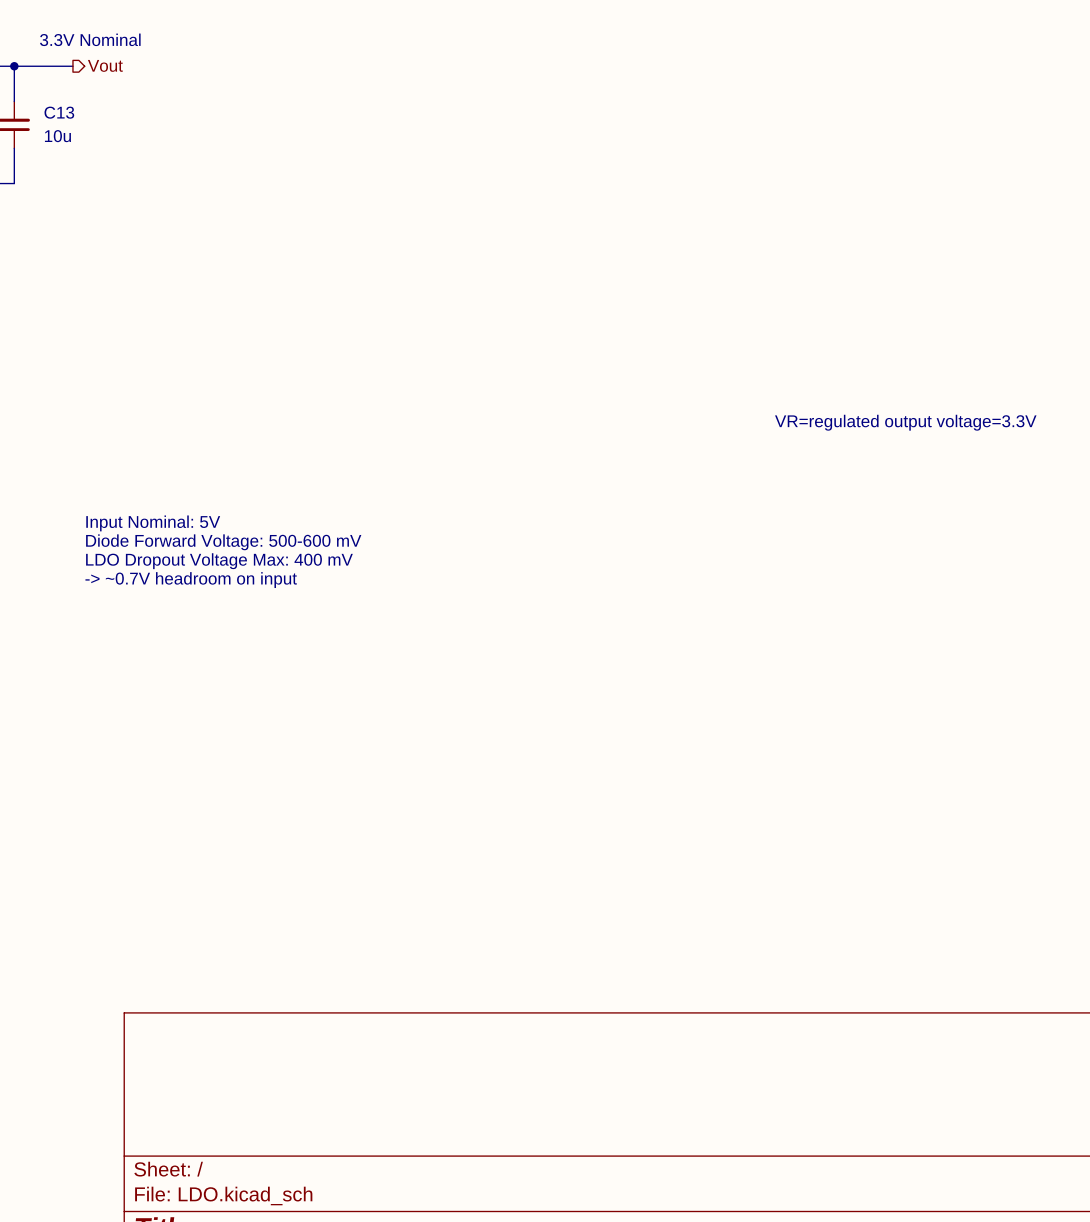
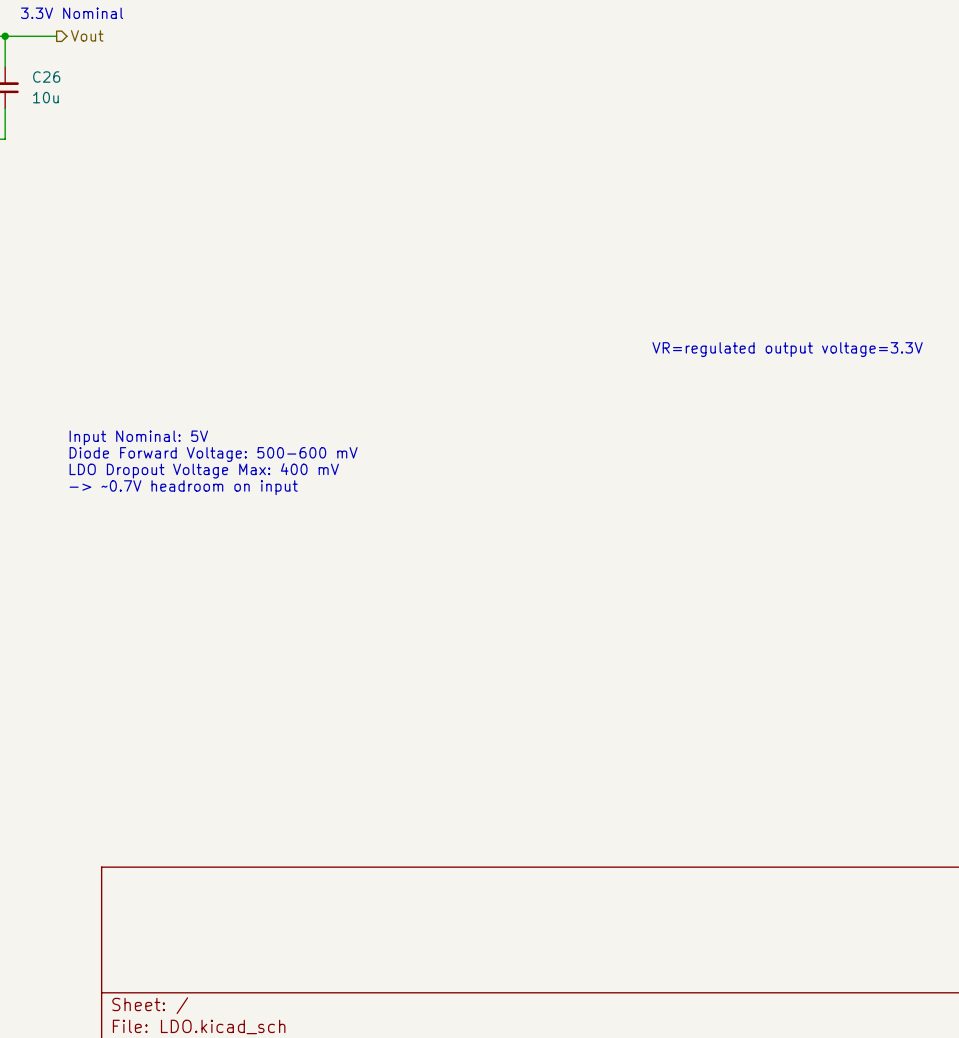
C13 name: C13 (59, 112) -> C26 (46, 77)

